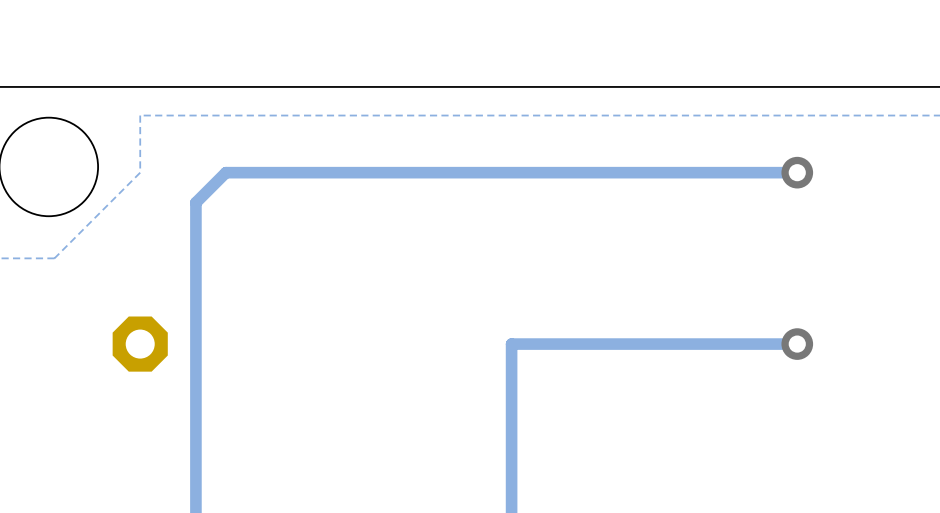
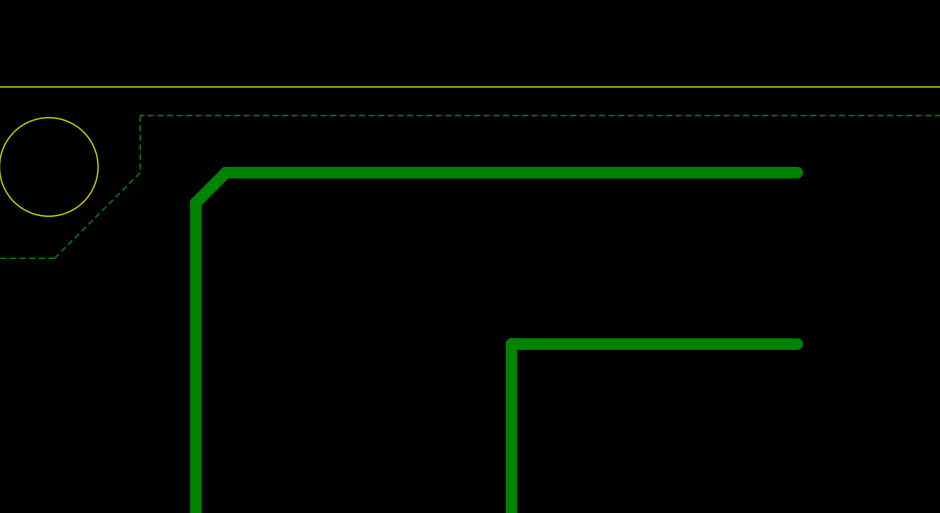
via: (797, 172) -> none
part: (140, 344) -> none
via: (797, 344) -> none

